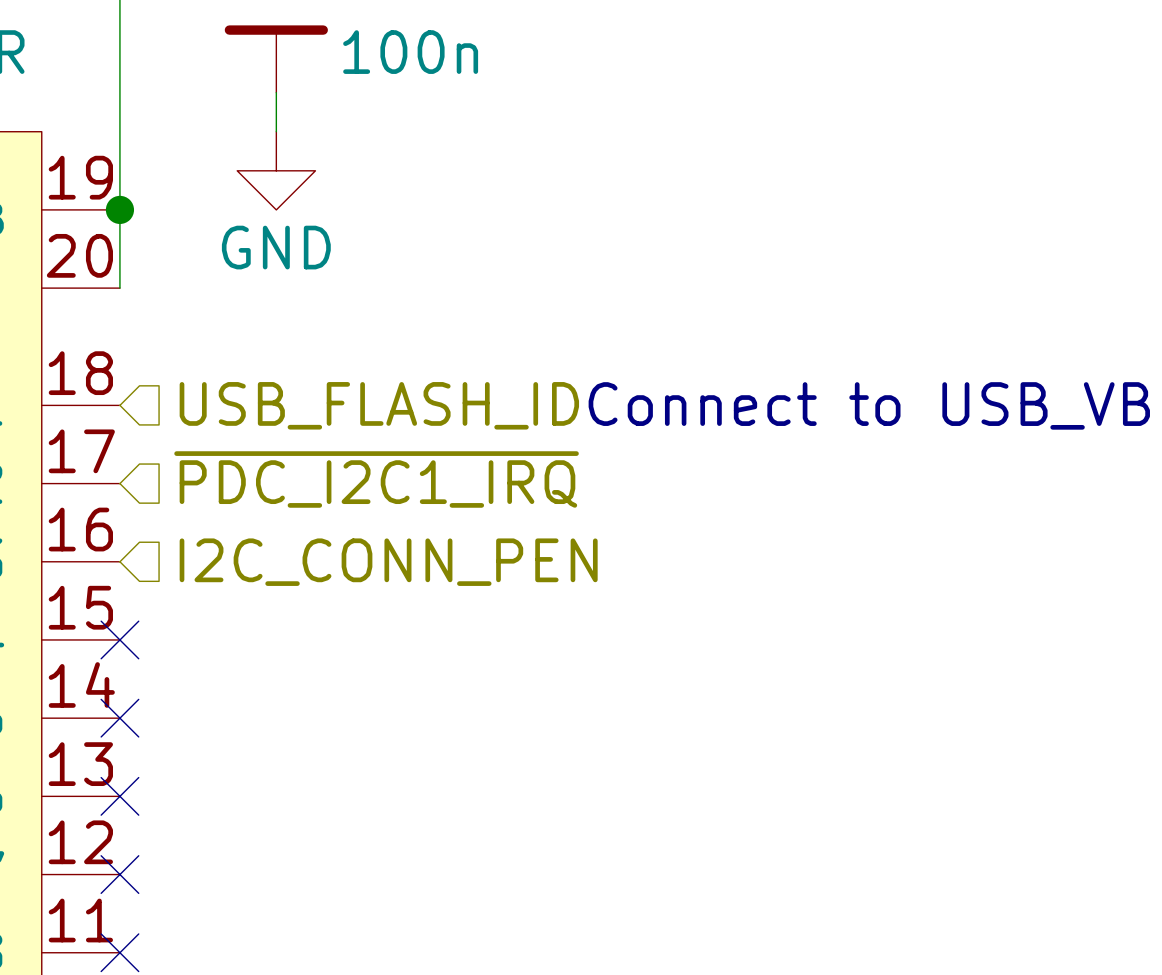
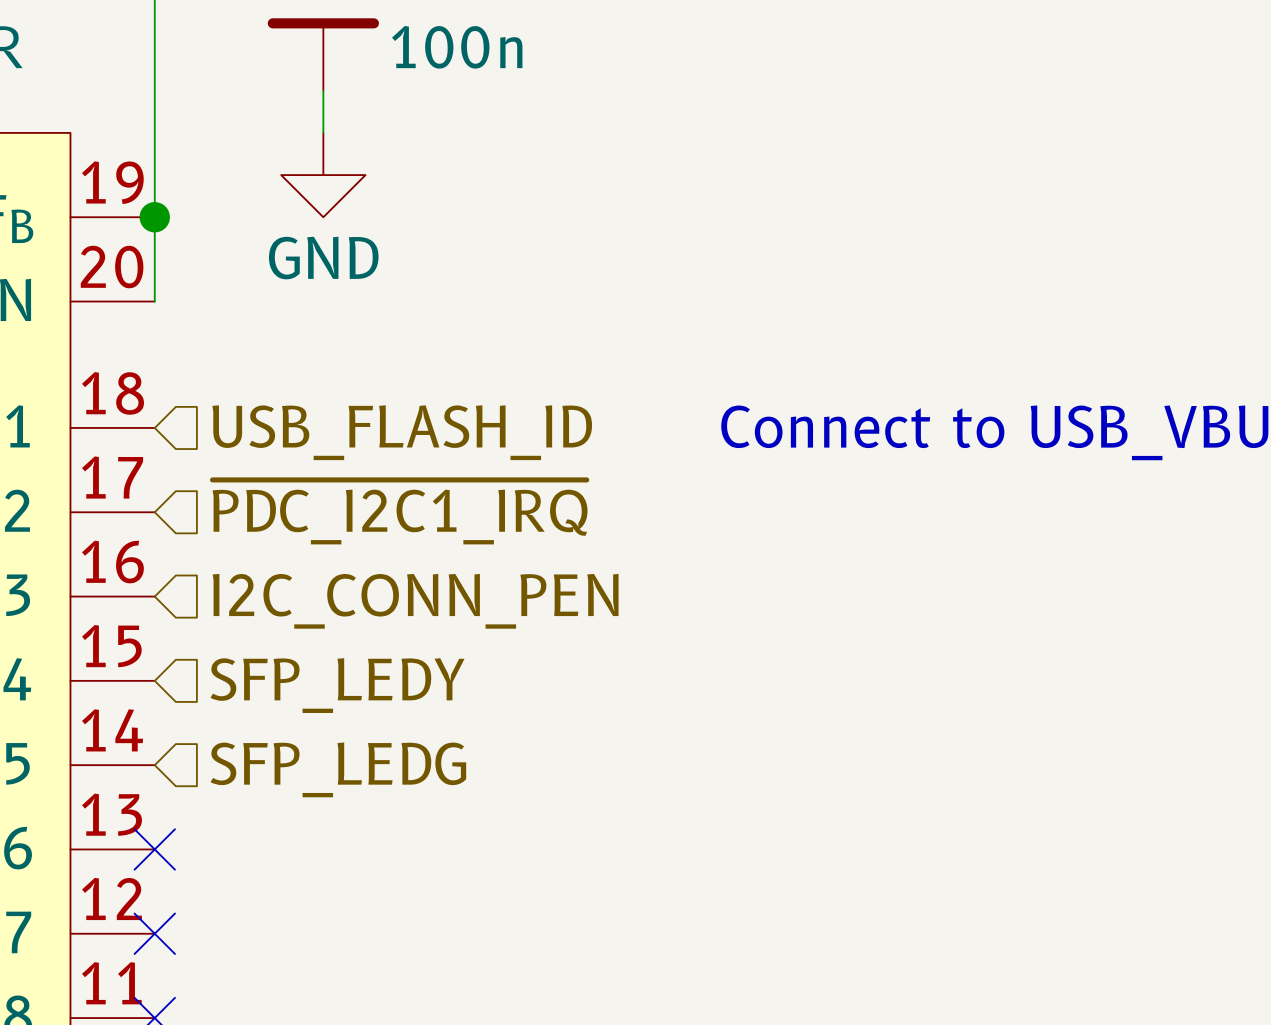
no-connect mark: (119, 639) -> none
hierarchical label: none -> SFP_LEDY (337, 685)
no-connect mark: (119, 718) -> none
hierarchical label: none -> SFP_LEDG (338, 769)

